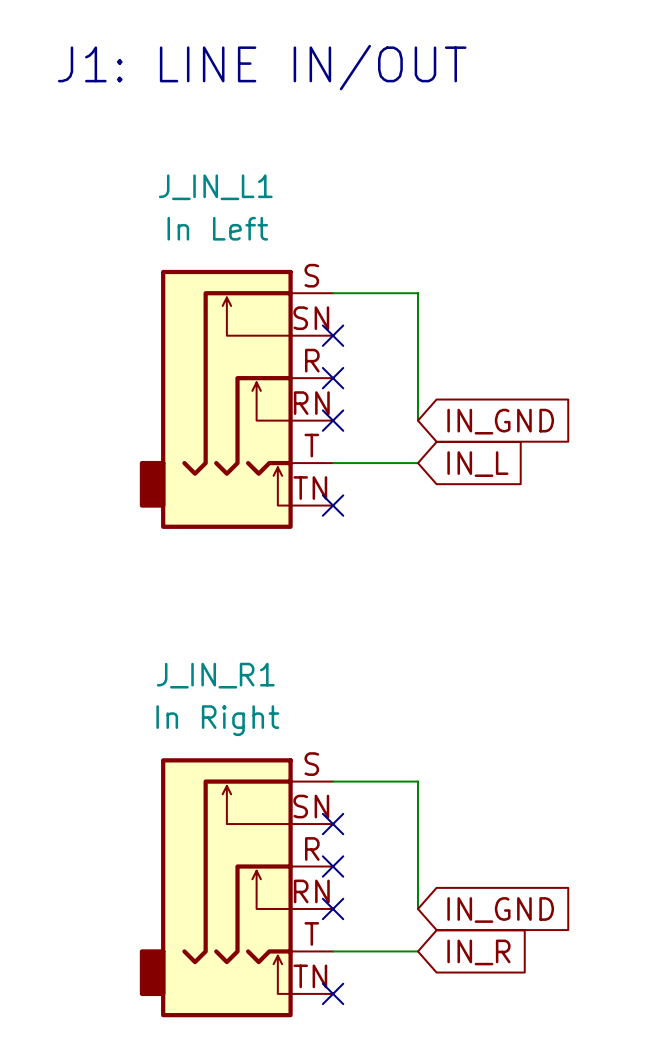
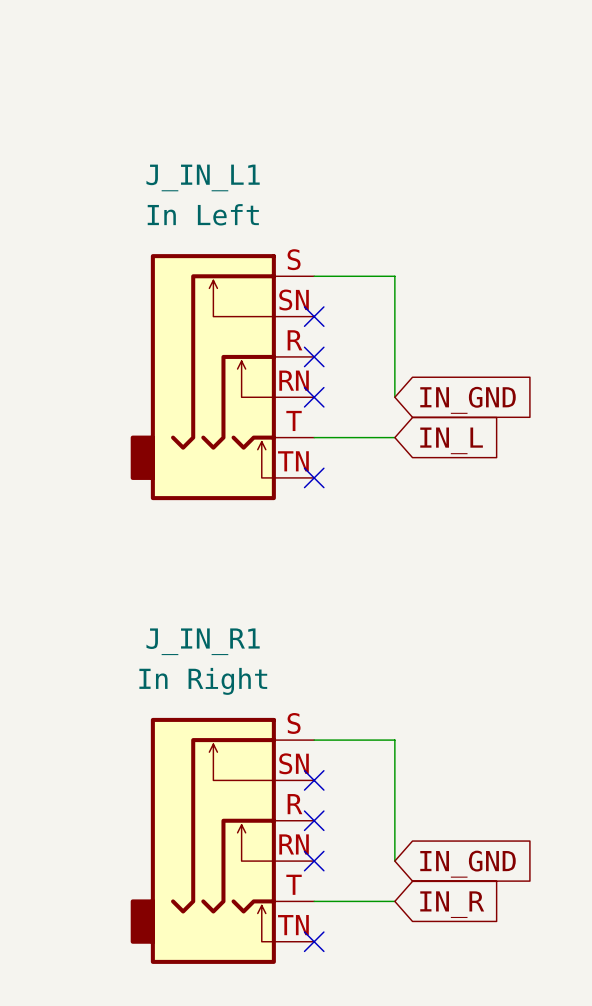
text: J1: LINE IN/OUT (262, 67) -> none

